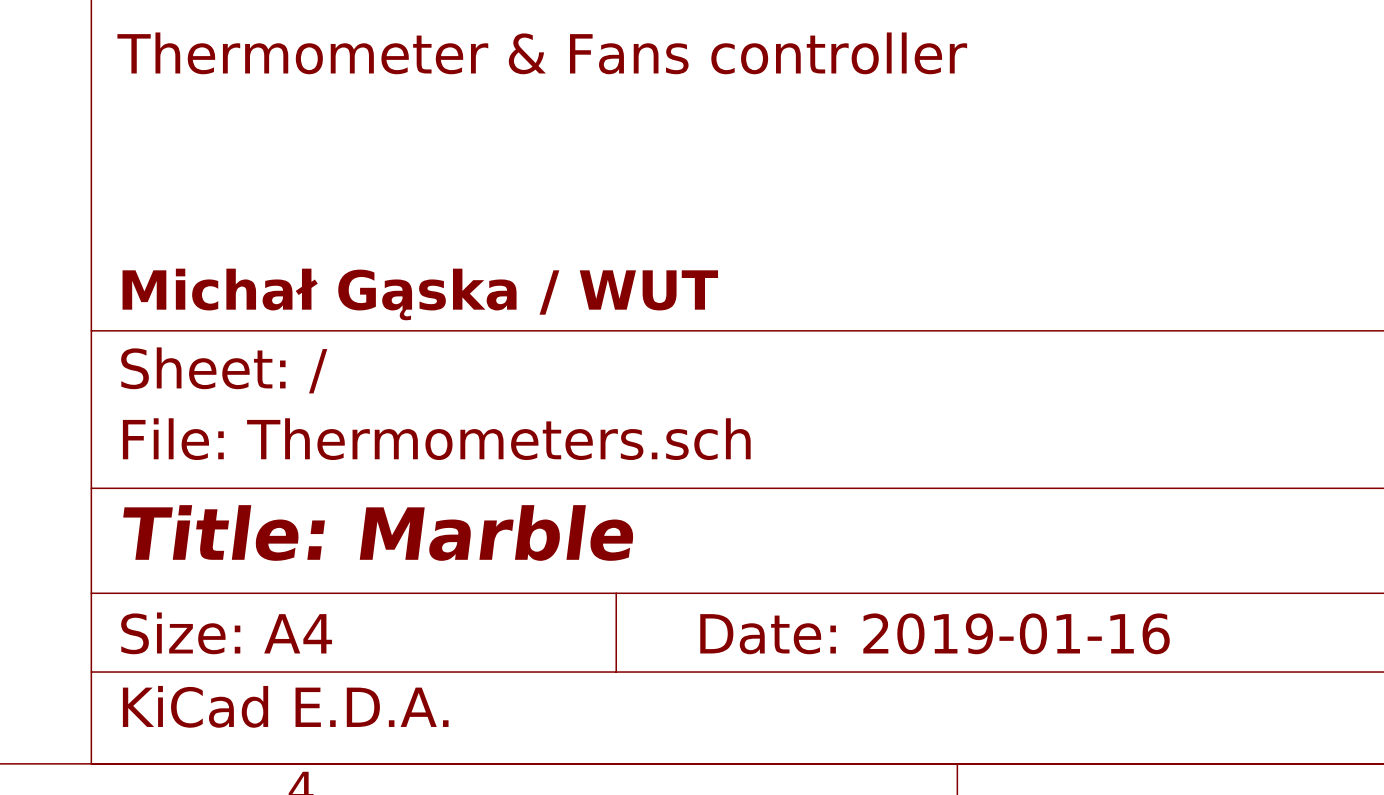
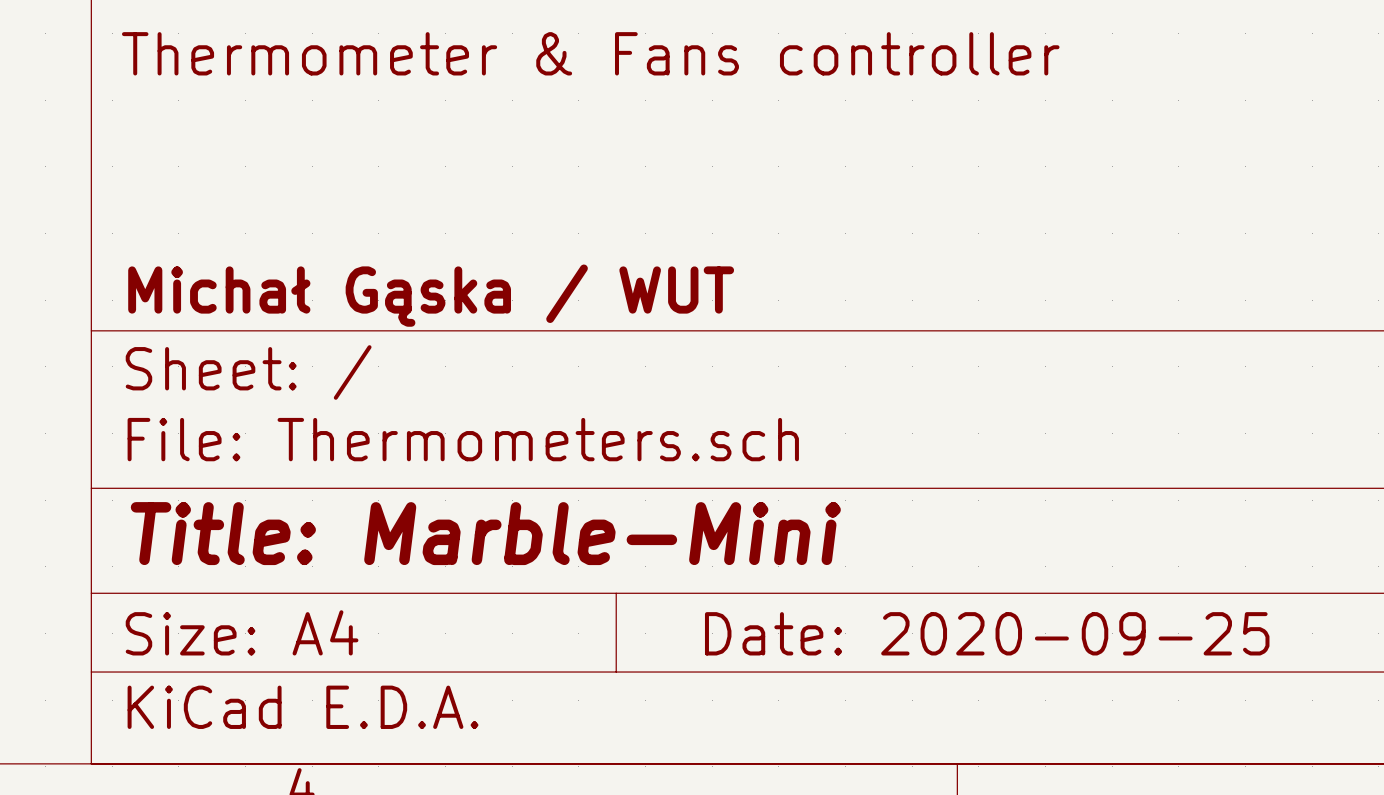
title block: Title: Marble (378, 532) -> Title: Marble-Mini (485, 533)
title block: Date: 2019-01-16 (935, 633) -> Date: 2020-09-25 (987, 633)

